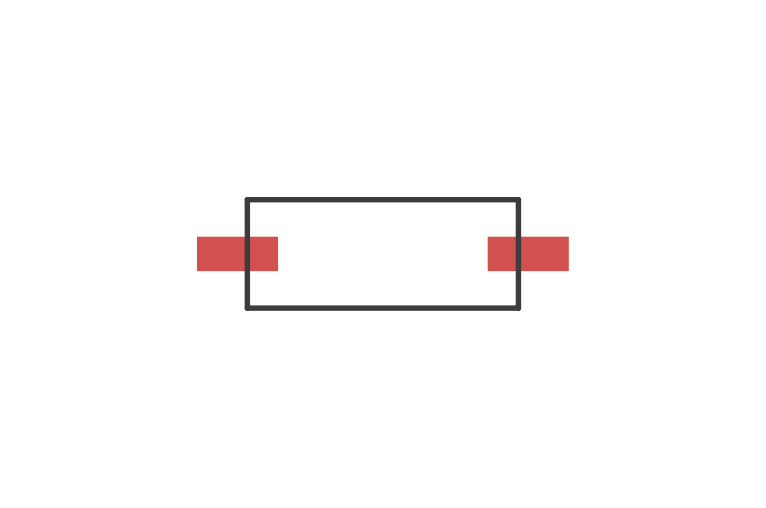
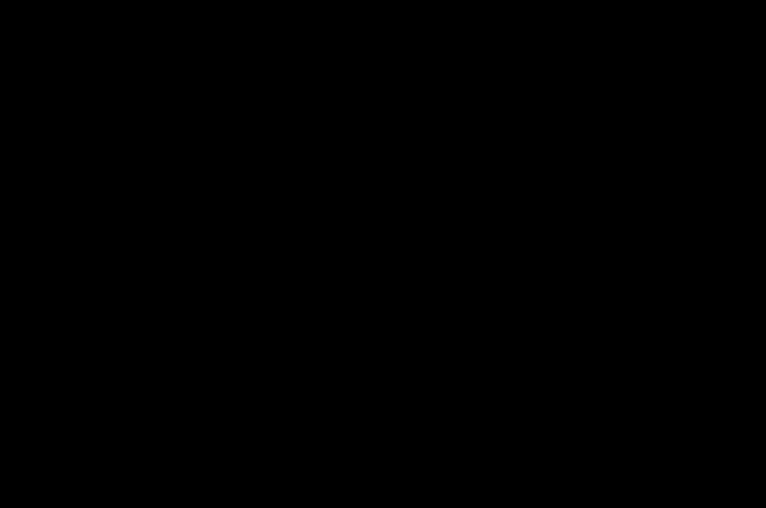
part: (382, 253) -> none

